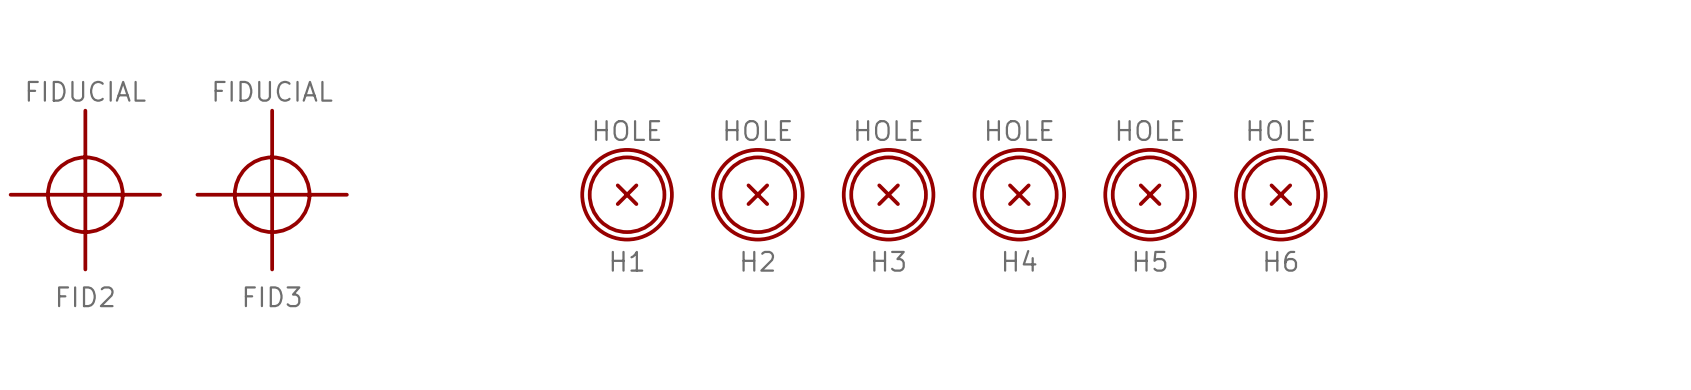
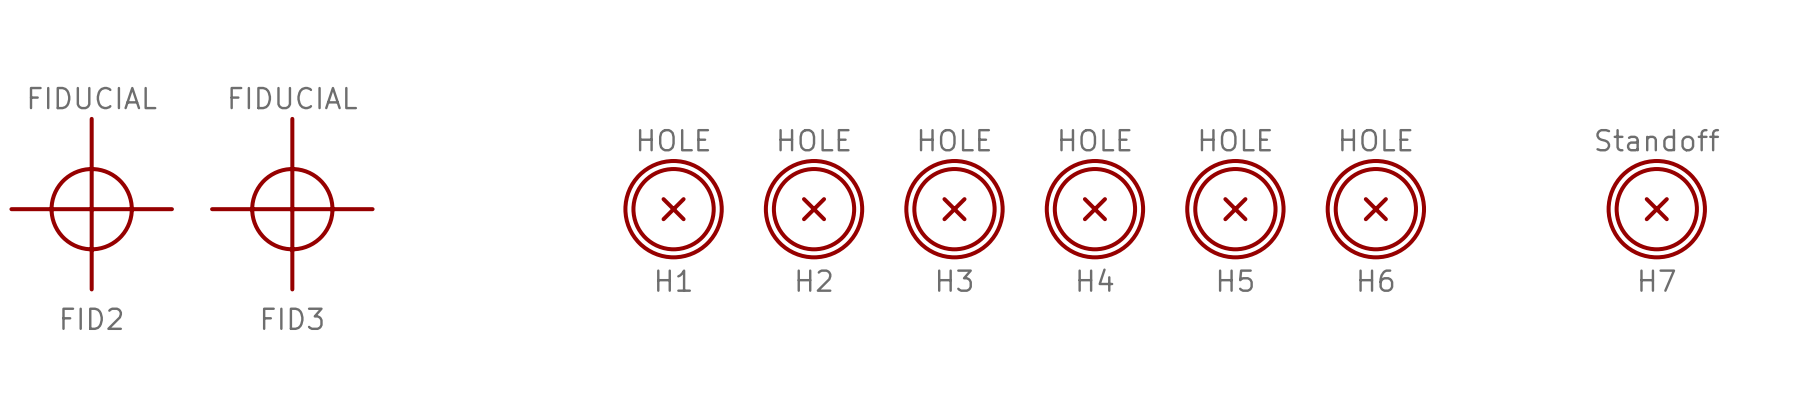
H7: none -> Standoff (1656, 209)

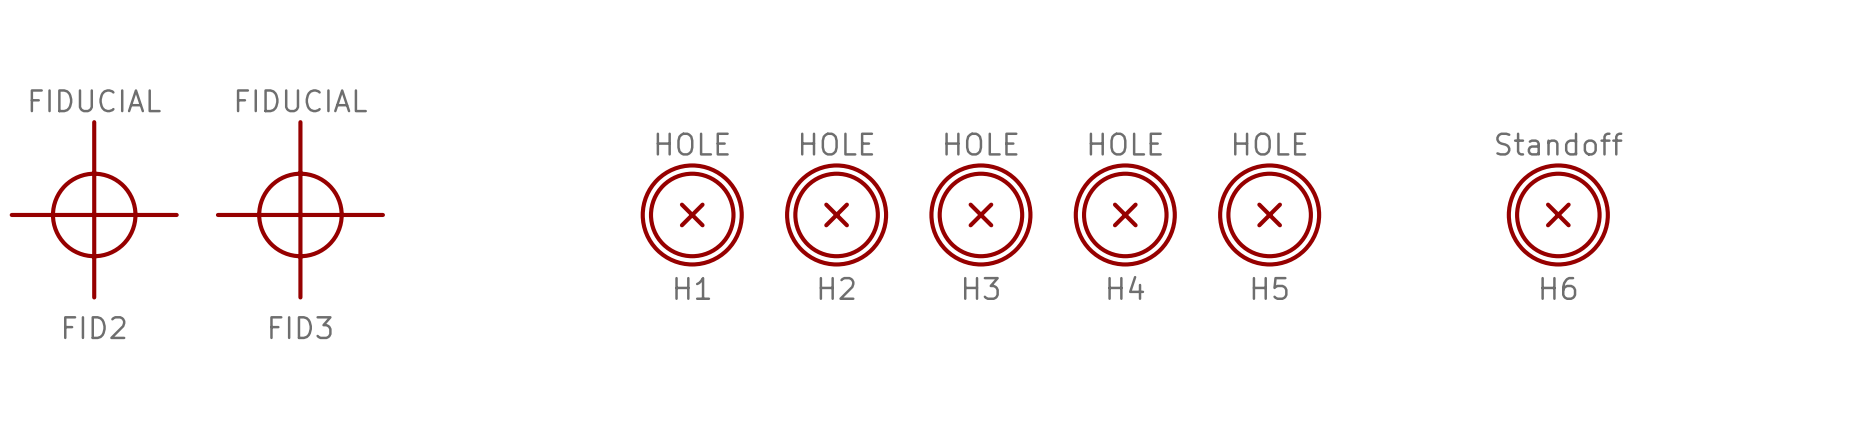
H6 value: HOLE (1376, 140) -> Standoff (1559, 144)
H6 position: (1375, 209) -> (1558, 214)
H7: Standoff (1656, 209) -> none

